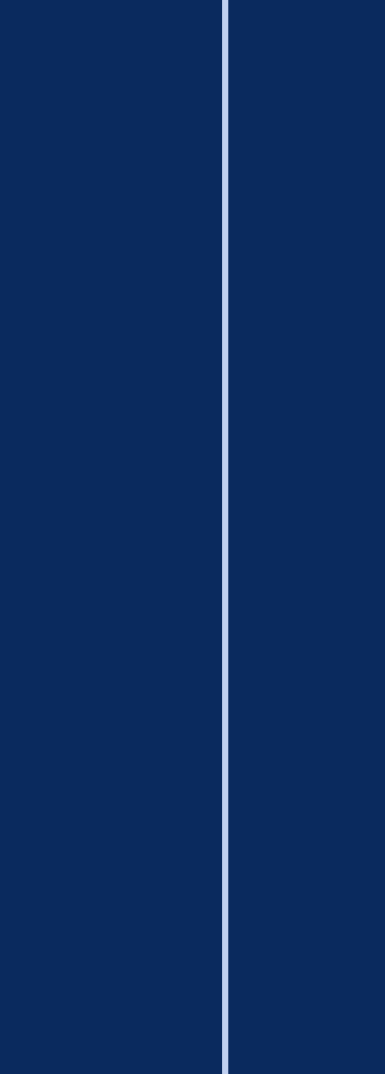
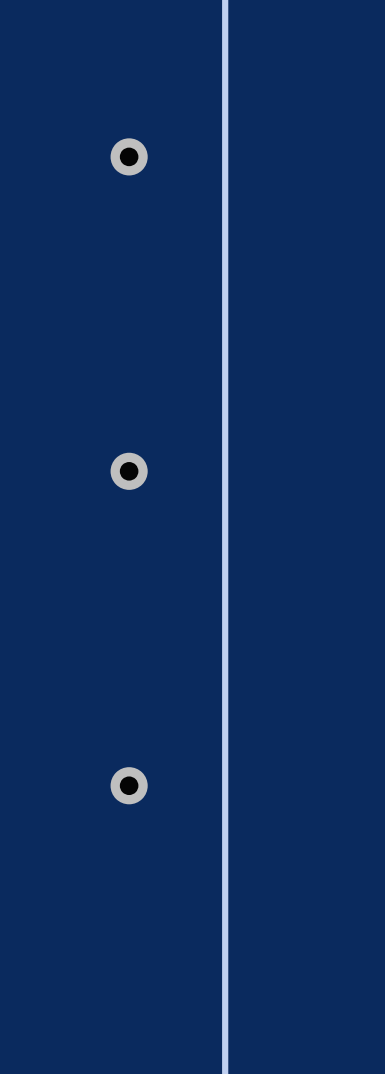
via: none -> (129, 156)
via: none -> (129, 471)
via: none -> (129, 785)

